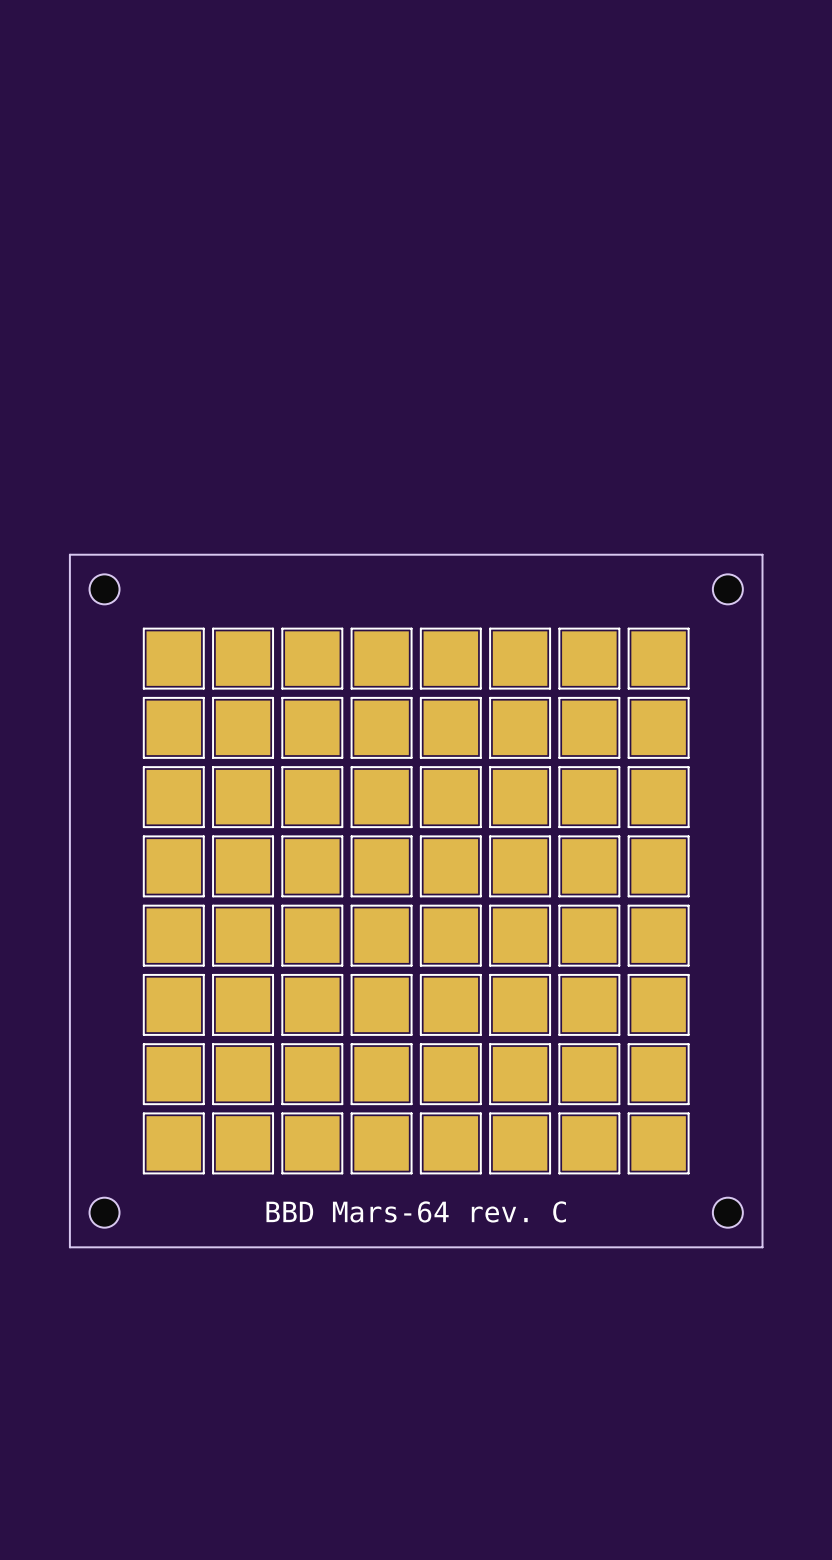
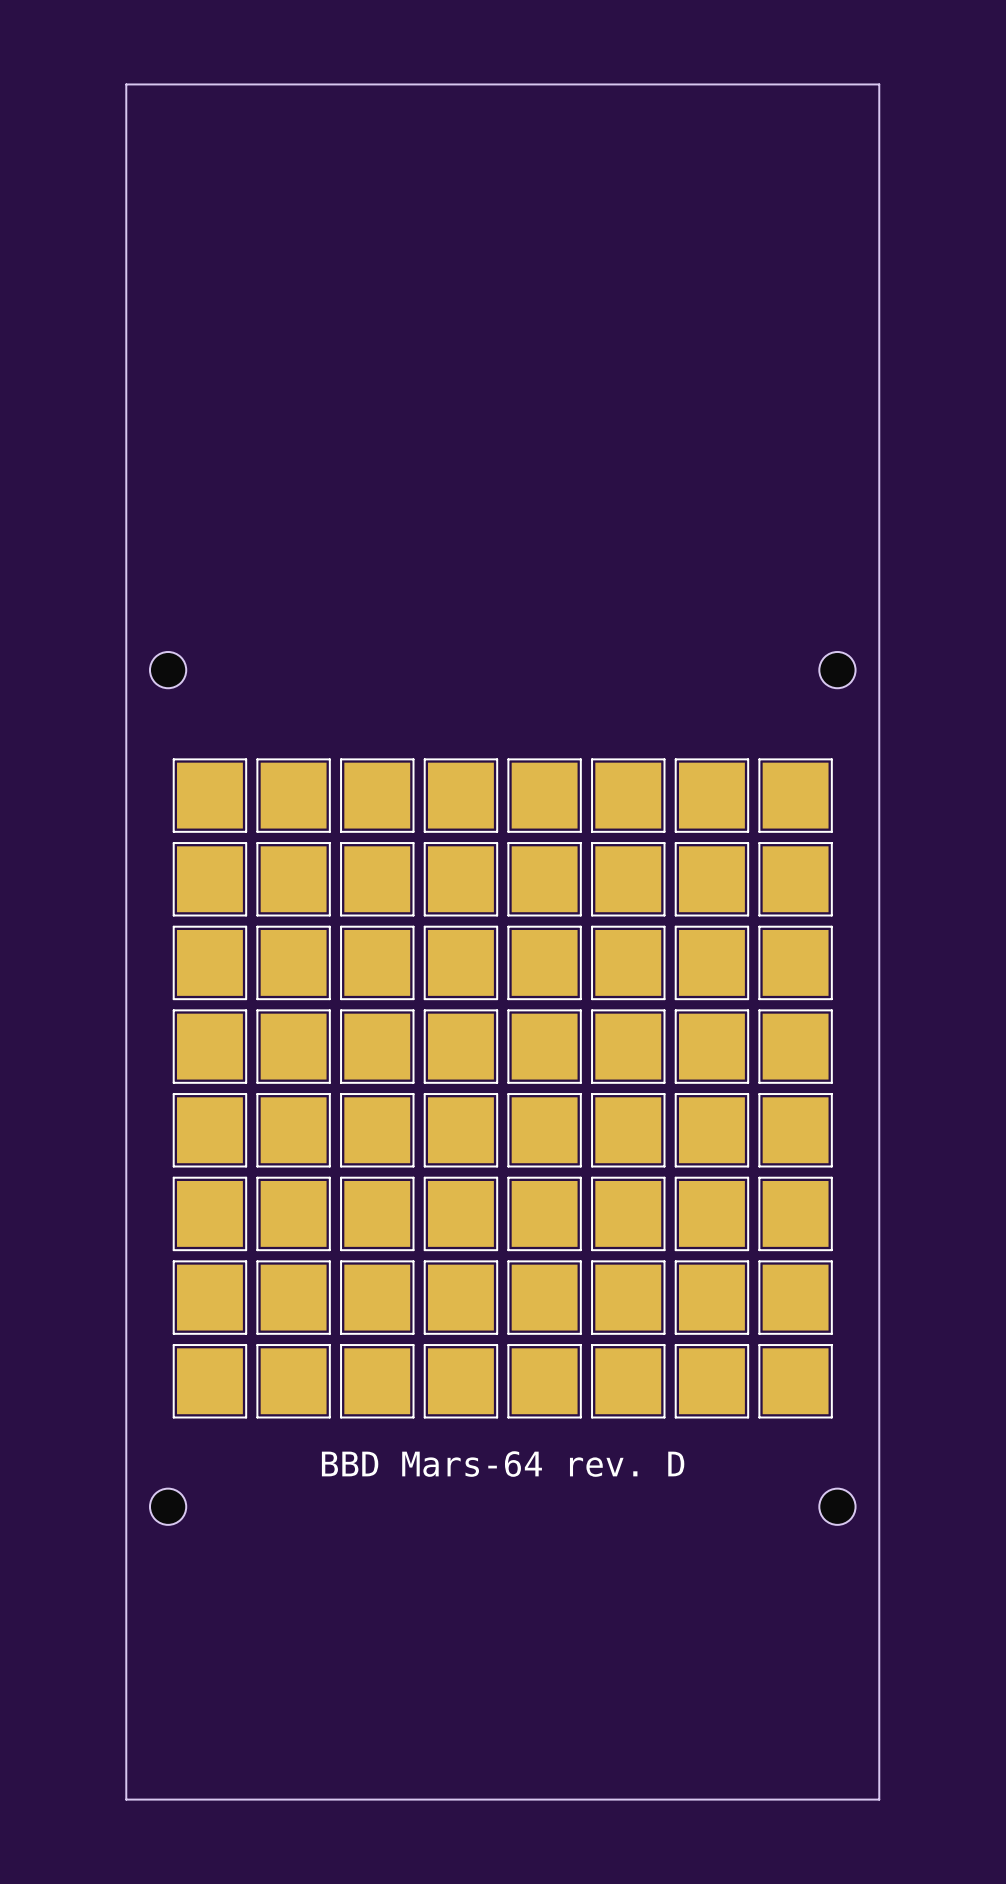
board edge: none -> (126, 84) (126, 1799) (879, 1799) (879, 84) (126, 84)
board edge: (69, 554) (69, 1247) (762, 1247) (762, 554) (69, 554) -> none
part position: (104, 589) -> (168, 670)
part position: (727, 589) -> (837, 670)
text: BBD Mars-64 rev. C (416, 1211) -> BBD Mars-64 rev. D (503, 1464)
part position: (104, 1212) -> (168, 1506)
part position: (727, 1212) -> (837, 1506)

